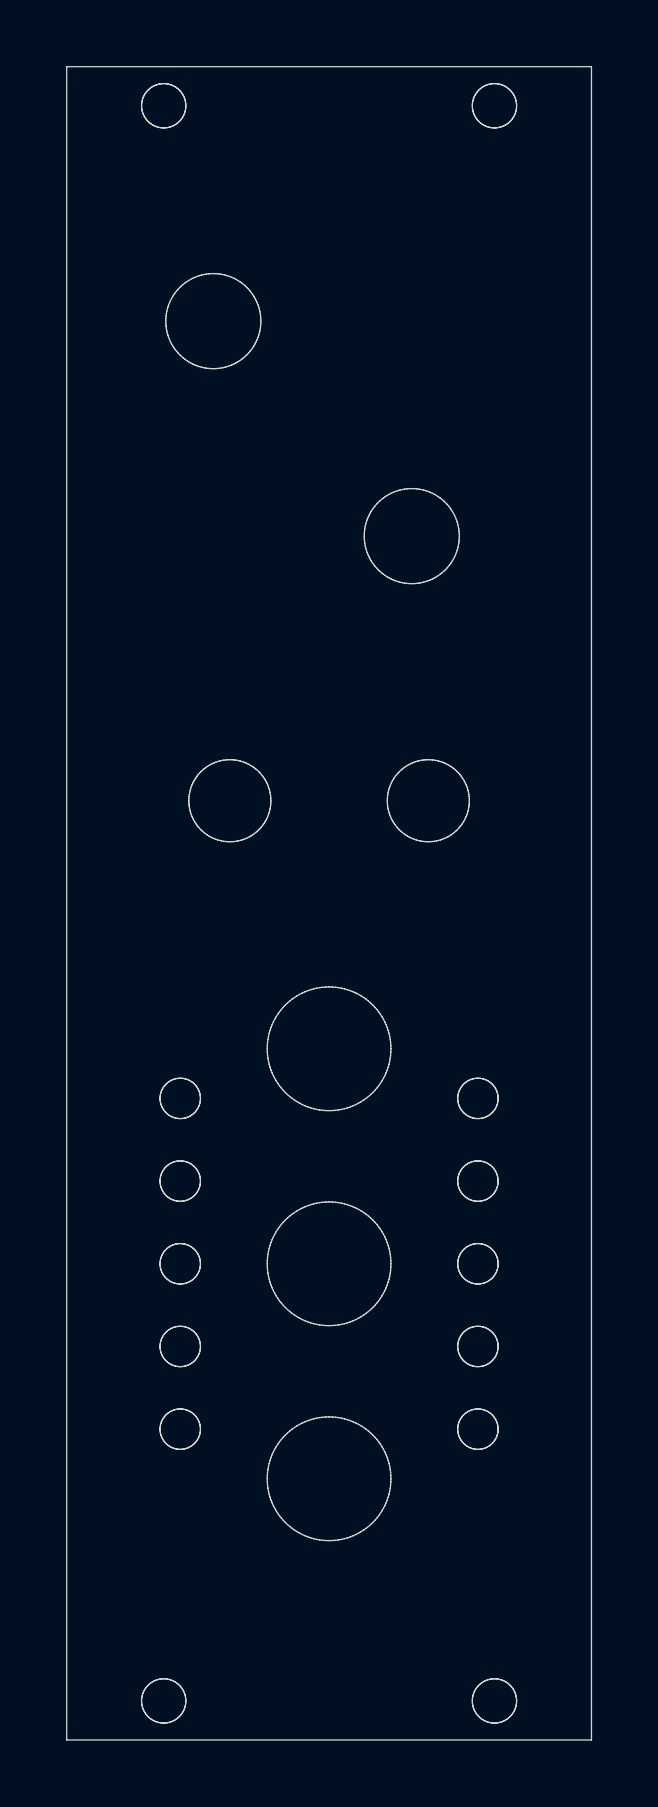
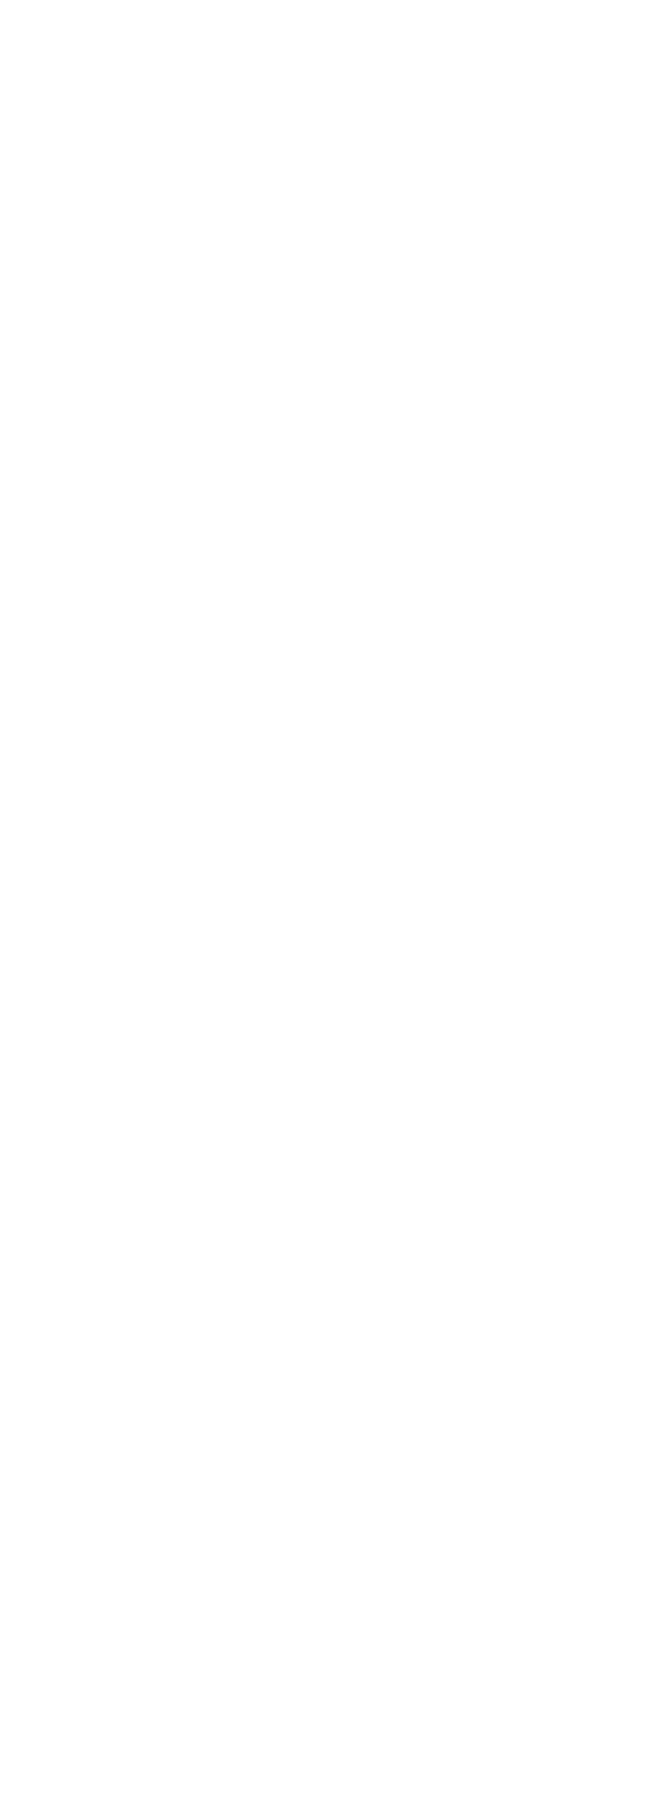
board edge: (591, 66) (591, 1739) (66, 1739) (66, 66) (591, 66) -> none
board edge: (164, 83) (173, 85) (180, 90) (184, 98) (185, 106) (183, 115) (178, 122) (171, 126) (162, 127) (154, 125) (147, 120) (142, 113) (141, 104) (143, 96) (148, 89) (156, 84) (164, 83) -> none
board edge: (495, 83) (504, 85) (510, 90) (515, 98) (516, 106) (514, 115) (509, 122) (502, 126) (493, 127) (484, 125) (478, 120) (473, 113) (472, 104) (474, 96) (479, 89) (486, 84) (495, 83) -> none
board edge: (215, 273) (233, 278) (248, 289) (257, 304) (260, 323) (256, 341) (245, 356) (229, 365) (210, 368) (192, 363) (178, 353) (168, 337) (165, 318) (170, 300) (181, 285) (196, 276) (215, 273) -> none
board edge: (414, 488) (432, 493) (446, 504) (456, 519) (459, 538) (454, 556) (443, 571) (428, 580) (409, 583) (391, 578) (376, 568) (367, 552) (364, 533) (368, 515) (379, 500) (395, 491) (414, 488) -> none
board edge: (231, 759) (247, 763) (260, 773) (268, 786) (270, 802) (266, 818) (257, 831) (243, 839) (227, 841) (212, 837) (199, 828) (191, 814) (188, 798) (192, 782) (202, 770) (215, 762) (231, 759) -> none
board edge: (430, 759) (446, 763) (458, 773) (466, 786) (469, 802) (465, 818) (455, 831) (442, 839) (426, 841) (410, 837) (397, 828) (389, 814) (387, 798) (391, 782) (400, 770) (414, 762) (430, 759) -> none
board edge: (329, 986) (353, 991) (372, 1005) (386, 1024) (390, 1048) (386, 1072) (372, 1092) (353, 1105) (329, 1110) (305, 1105) (285, 1092) (272, 1072) (267, 1048) (272, 1024) (285, 1005) (305, 991) (329, 986) -> none
board edge: (181, 1078) (188, 1080) (195, 1084) (199, 1091) (200, 1099) (198, 1107) (193, 1113) (187, 1117) (179, 1118) (171, 1116) (165, 1111) (161, 1105) (160, 1097) (162, 1089) (166, 1083) (173, 1079) (181, 1078) -> none
board edge: (478, 1078) (486, 1080) (492, 1084) (496, 1091) (498, 1099) (496, 1107) (491, 1113) (484, 1117) (476, 1118) (469, 1116) (462, 1111) (458, 1105) (457, 1097) (459, 1089) (464, 1083) (470, 1079) (478, 1078) -> none
board edge: (181, 1160) (188, 1162) (195, 1167) (199, 1174) (200, 1182) (198, 1189) (193, 1196) (187, 1200) (179, 1201) (171, 1199) (165, 1194) (161, 1188) (160, 1180) (162, 1172) (166, 1166) (173, 1162) (181, 1160) -> none
board edge: (478, 1160) (486, 1162) (492, 1167) (496, 1174) (498, 1182) (496, 1189) (491, 1196) (484, 1200) (476, 1201) (469, 1199) (462, 1194) (458, 1188) (457, 1180) (459, 1172) (464, 1166) (470, 1162) (478, 1160) -> none
board edge: (329, 1201) (353, 1206) (372, 1220) (386, 1239) (390, 1263) (386, 1287) (372, 1307) (353, 1320) (329, 1325) (305, 1320) (285, 1307) (272, 1287) (267, 1263) (272, 1239) (285, 1220) (305, 1206) (329, 1201) -> none
board edge: (181, 1243) (188, 1245) (195, 1250) (199, 1256) (200, 1264) (198, 1272) (193, 1278) (187, 1282) (179, 1283) (171, 1281) (165, 1277) (161, 1270) (160, 1262) (162, 1255) (166, 1248) (173, 1244) (181, 1243) -> none
board edge: (478, 1243) (486, 1245) (492, 1250) (496, 1256) (498, 1264) (496, 1272) (491, 1278) (484, 1282) (476, 1283) (469, 1281) (462, 1277) (458, 1270) (457, 1262) (459, 1255) (464, 1248) (470, 1244) (478, 1243) -> none
board edge: (181, 1326) (188, 1328) (195, 1332) (199, 1339) (200, 1347) (198, 1355) (193, 1361) (187, 1365) (179, 1366) (171, 1364) (165, 1360) (161, 1353) (160, 1345) (162, 1337) (166, 1331) (173, 1327) (181, 1326) -> none
board edge: (478, 1326) (486, 1328) (492, 1332) (496, 1339) (498, 1347) (496, 1355) (491, 1361) (484, 1365) (476, 1366) (469, 1364) (462, 1360) (458, 1353) (457, 1345) (459, 1337) (464, 1331) (470, 1327) (478, 1326) -> none
board edge: (181, 1409) (188, 1410) (195, 1415) (199, 1422) (200, 1430) (198, 1437) (193, 1444) (187, 1448) (179, 1449) (171, 1447) (165, 1442) (161, 1436) (160, 1428) (162, 1420) (166, 1414) (173, 1410) (181, 1409) -> none
board edge: (478, 1409) (486, 1410) (492, 1415) (496, 1422) (498, 1430) (496, 1437) (491, 1444) (484, 1448) (476, 1449) (469, 1447) (462, 1442) (458, 1436) (457, 1428) (459, 1420) (464, 1414) (470, 1410) (478, 1409) -> none
board edge: (329, 1416) (353, 1421) (372, 1435) (386, 1454) (390, 1478) (386, 1502) (372, 1522) (353, 1535) (329, 1540) (305, 1535) (285, 1522) (272, 1502) (267, 1478) (272, 1454) (285, 1435) (305, 1421) (329, 1416) -> none
board edge: (164, 1678) (173, 1680) (180, 1686) (184, 1693) (185, 1702) (183, 1710) (178, 1717) (171, 1721) (162, 1723) (154, 1720) (147, 1715) (142, 1708) (141, 1699) (143, 1691) (148, 1684) (156, 1680) (164, 1678) -> none
board edge: (495, 1678) (504, 1680) (510, 1686) (515, 1693) (516, 1702) (514, 1710) (509, 1717) (502, 1721) (493, 1723) (484, 1720) (478, 1715) (473, 1708) (472, 1699) (474, 1691) (479, 1684) (486, 1680) (495, 1678) -> none

